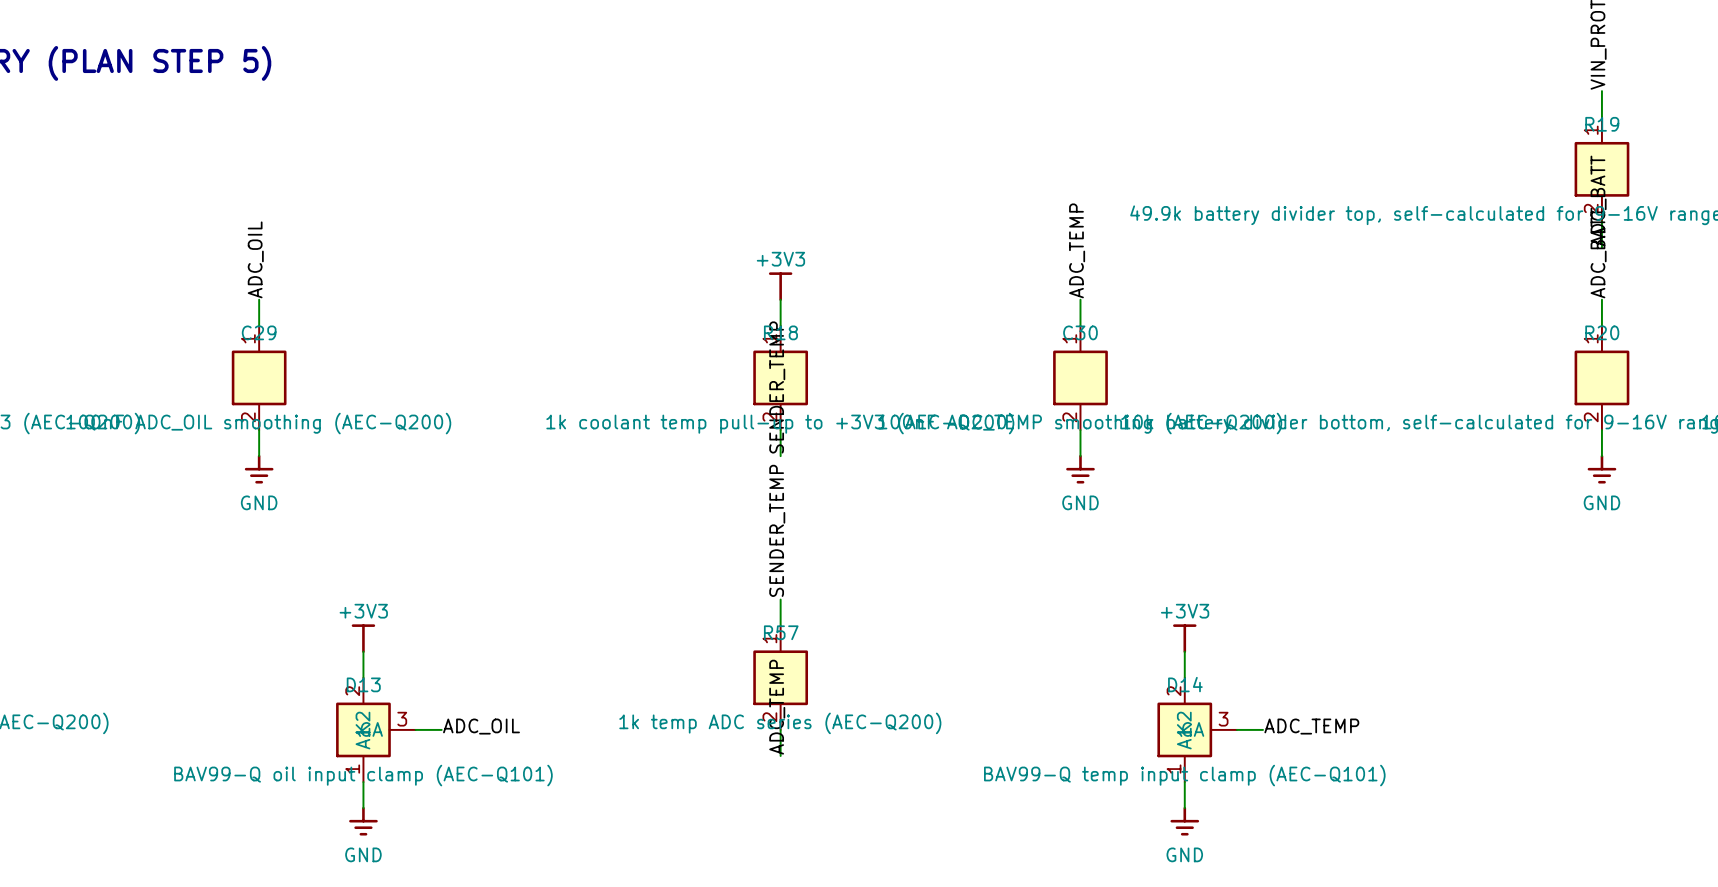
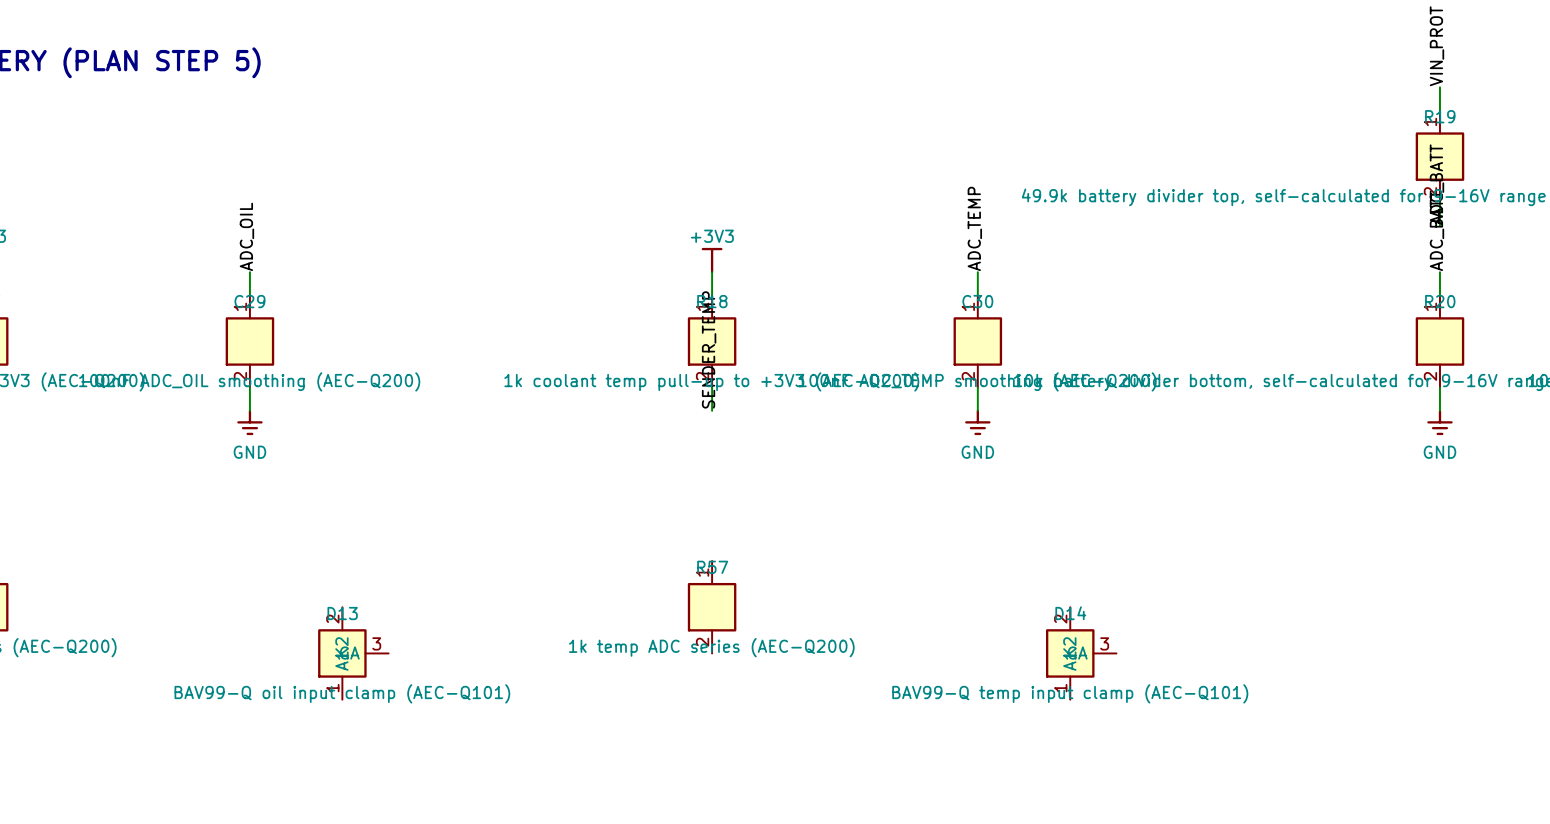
label: SENDER_TEMP (777, 530) -> none
wire: (780, 599) (780, 625) -> none
power symbol: +3V3 (363, 638) -> none
power symbol: +3V3 (1184, 638) -> none
wire: (363, 651) (363, 677) -> none
wire: (1184, 651) (1184, 677) -> none
label: ADC_TEMP (777, 707) -> none
label: ADC_OIL (481, 726) -> none
label: ADC_TEMP (1311, 726) -> none
wire: (415, 729) (441, 729) -> none
wire: (780, 729) (780, 756) -> none
wire: (1236, 729) (1263, 729) -> none
wire: (363, 782) (363, 808) -> none
wire: (1184, 782) (1184, 808) -> none
power symbol: GND (363, 821) -> none
power symbol: GND (1184, 821) -> none

